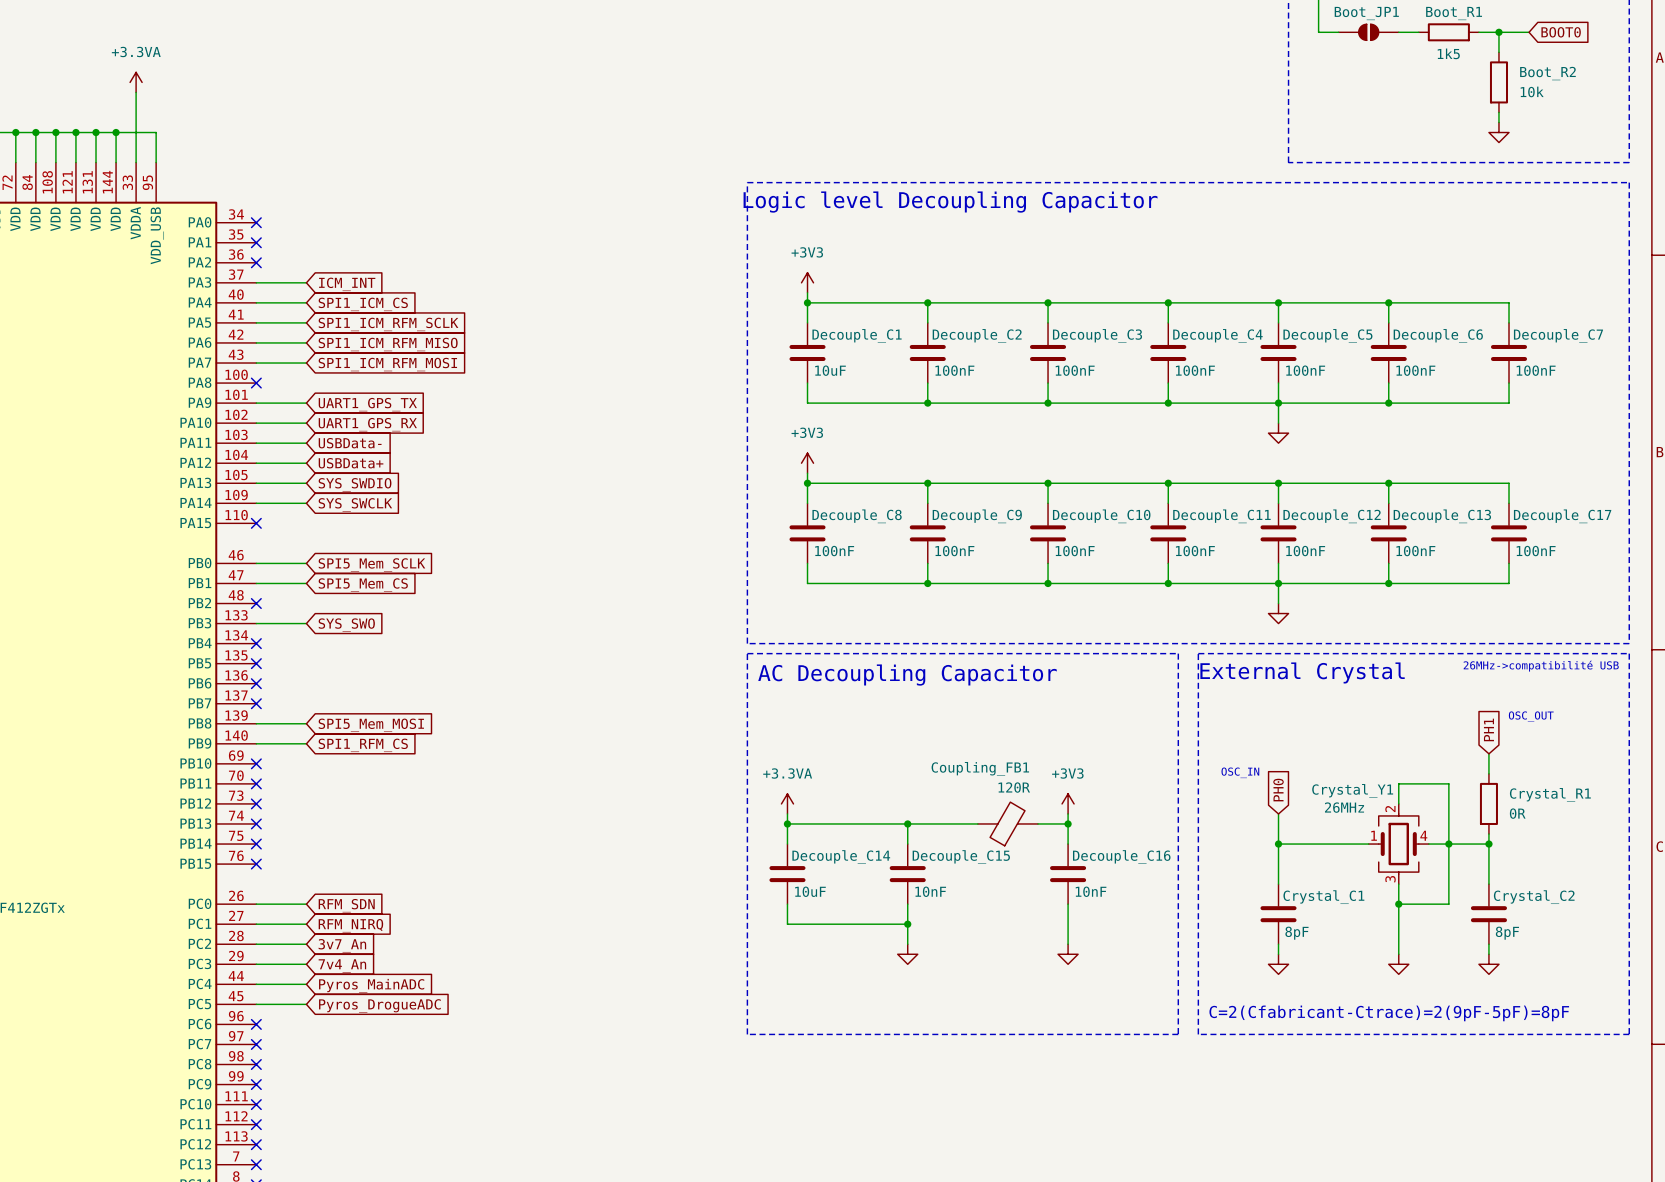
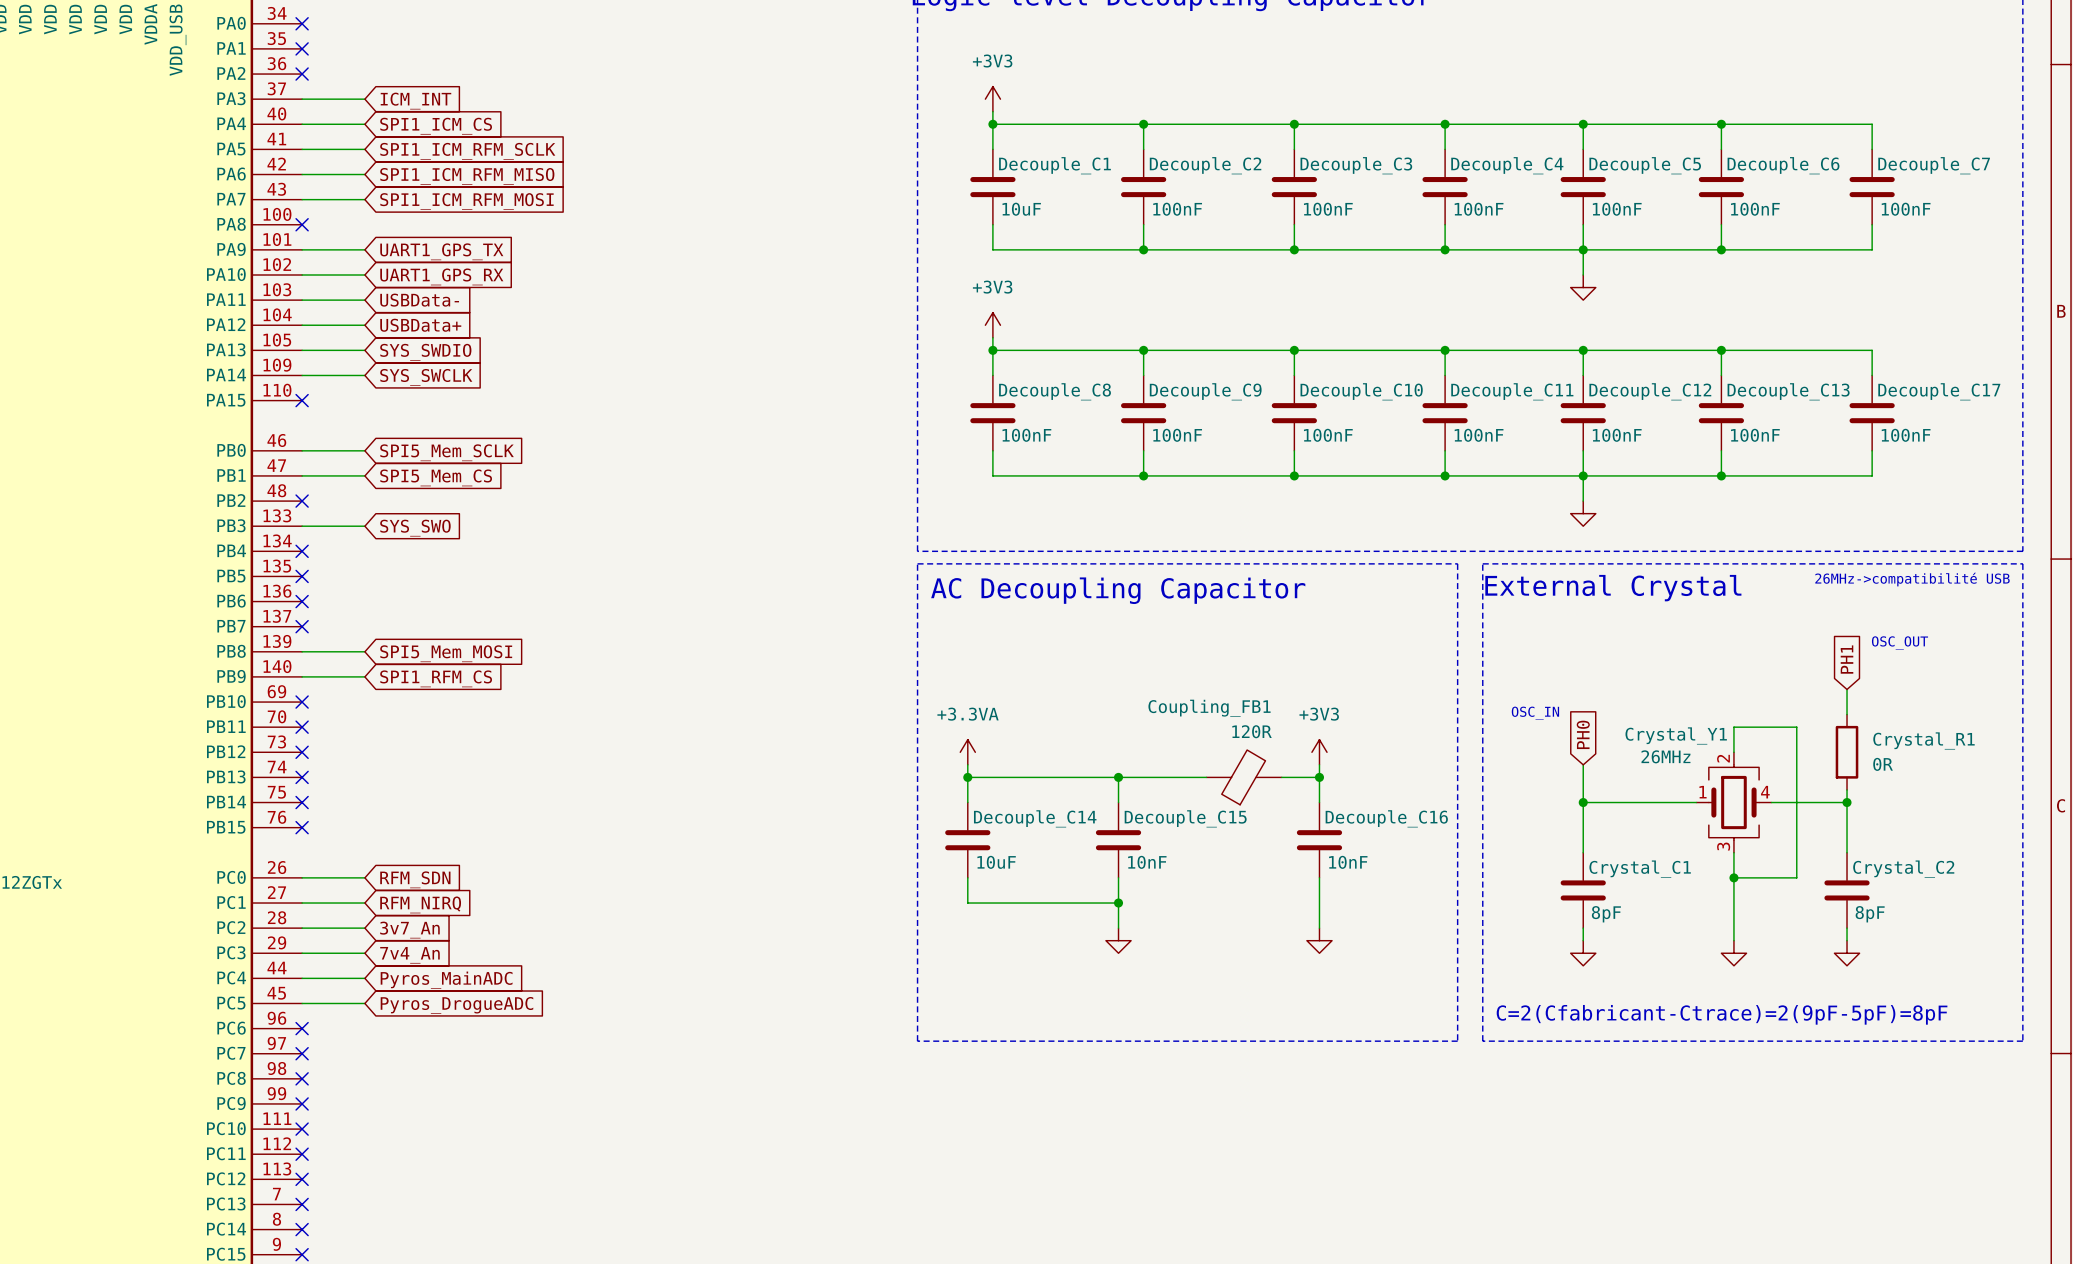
junction: (1448, 844) -> none

